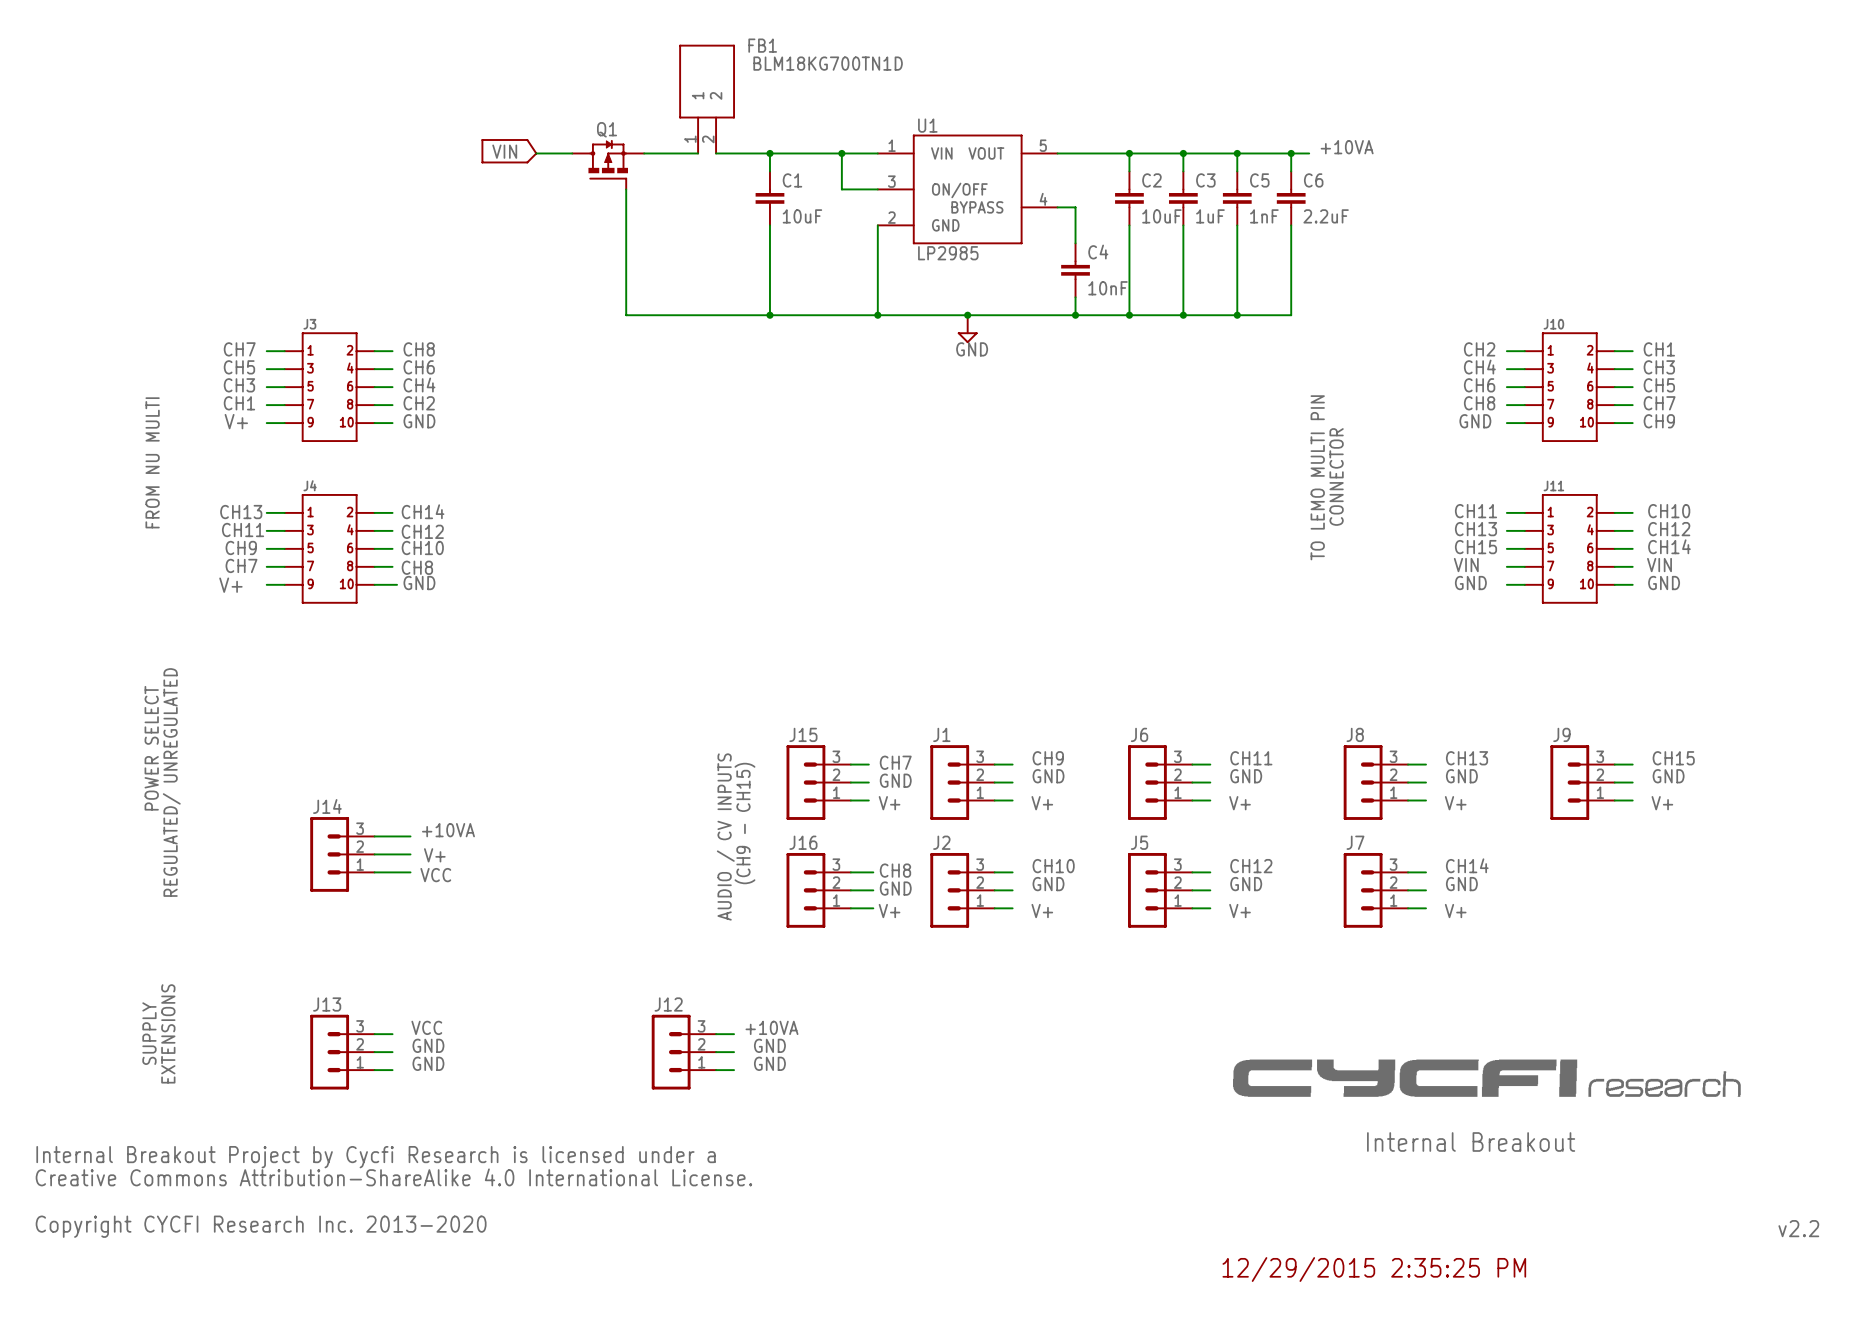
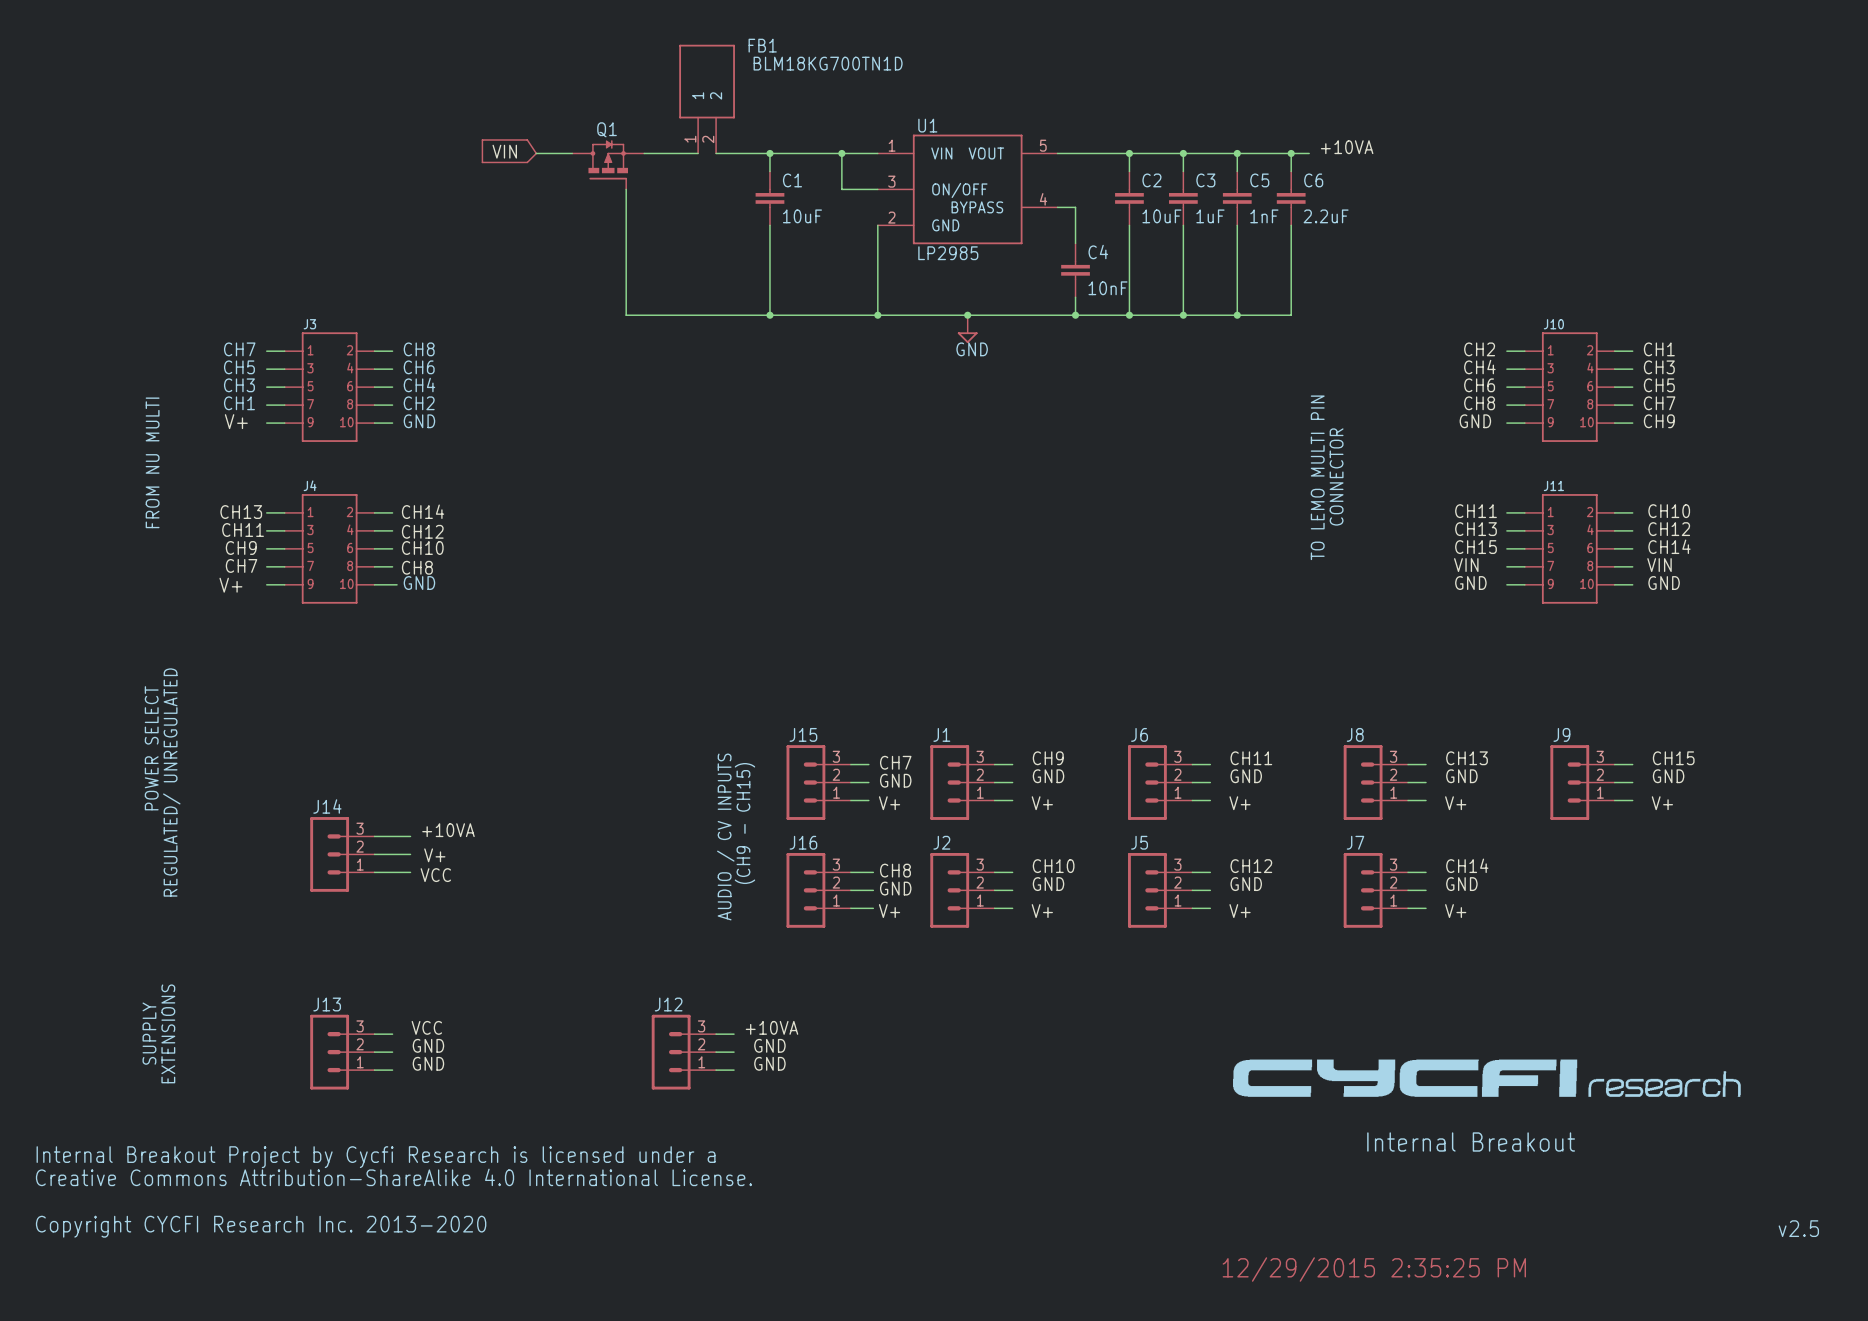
text: v2.2 (1798, 1228) -> v2.5 (1798, 1228)

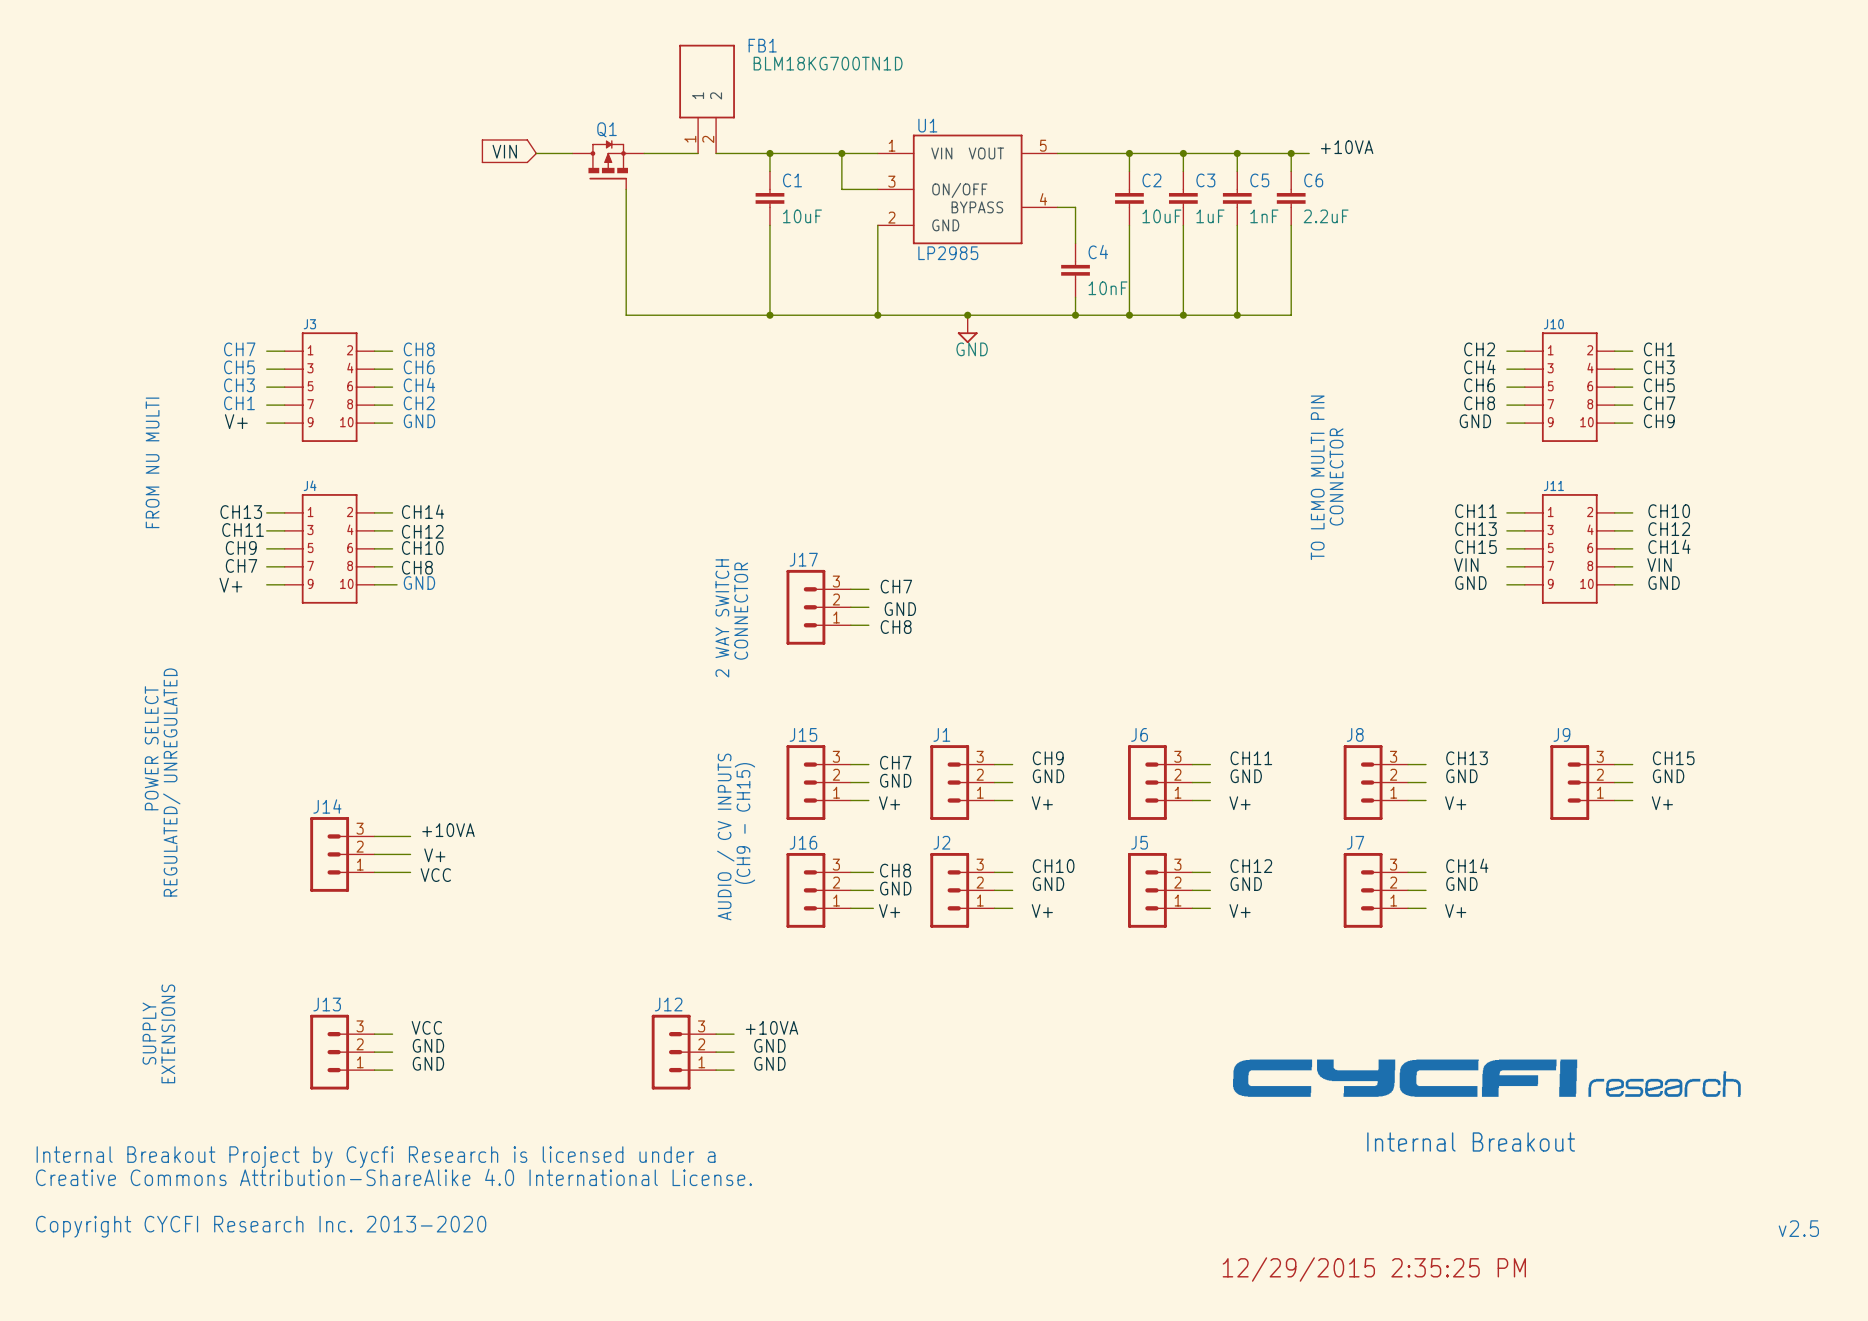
label: none -> CH7 (896, 586)
wire: none -> (850, 589) (868, 589)
J17: none -> (818, 607)
wire: none -> (850, 607) (868, 607)
label: none -> GND (900, 609)
text: none -> CONNECTOR (741, 611)
text: none -> 2 WAY SWITCH (722, 618)
wire: none -> (850, 625) (868, 625)
label: none -> CH8 (896, 627)

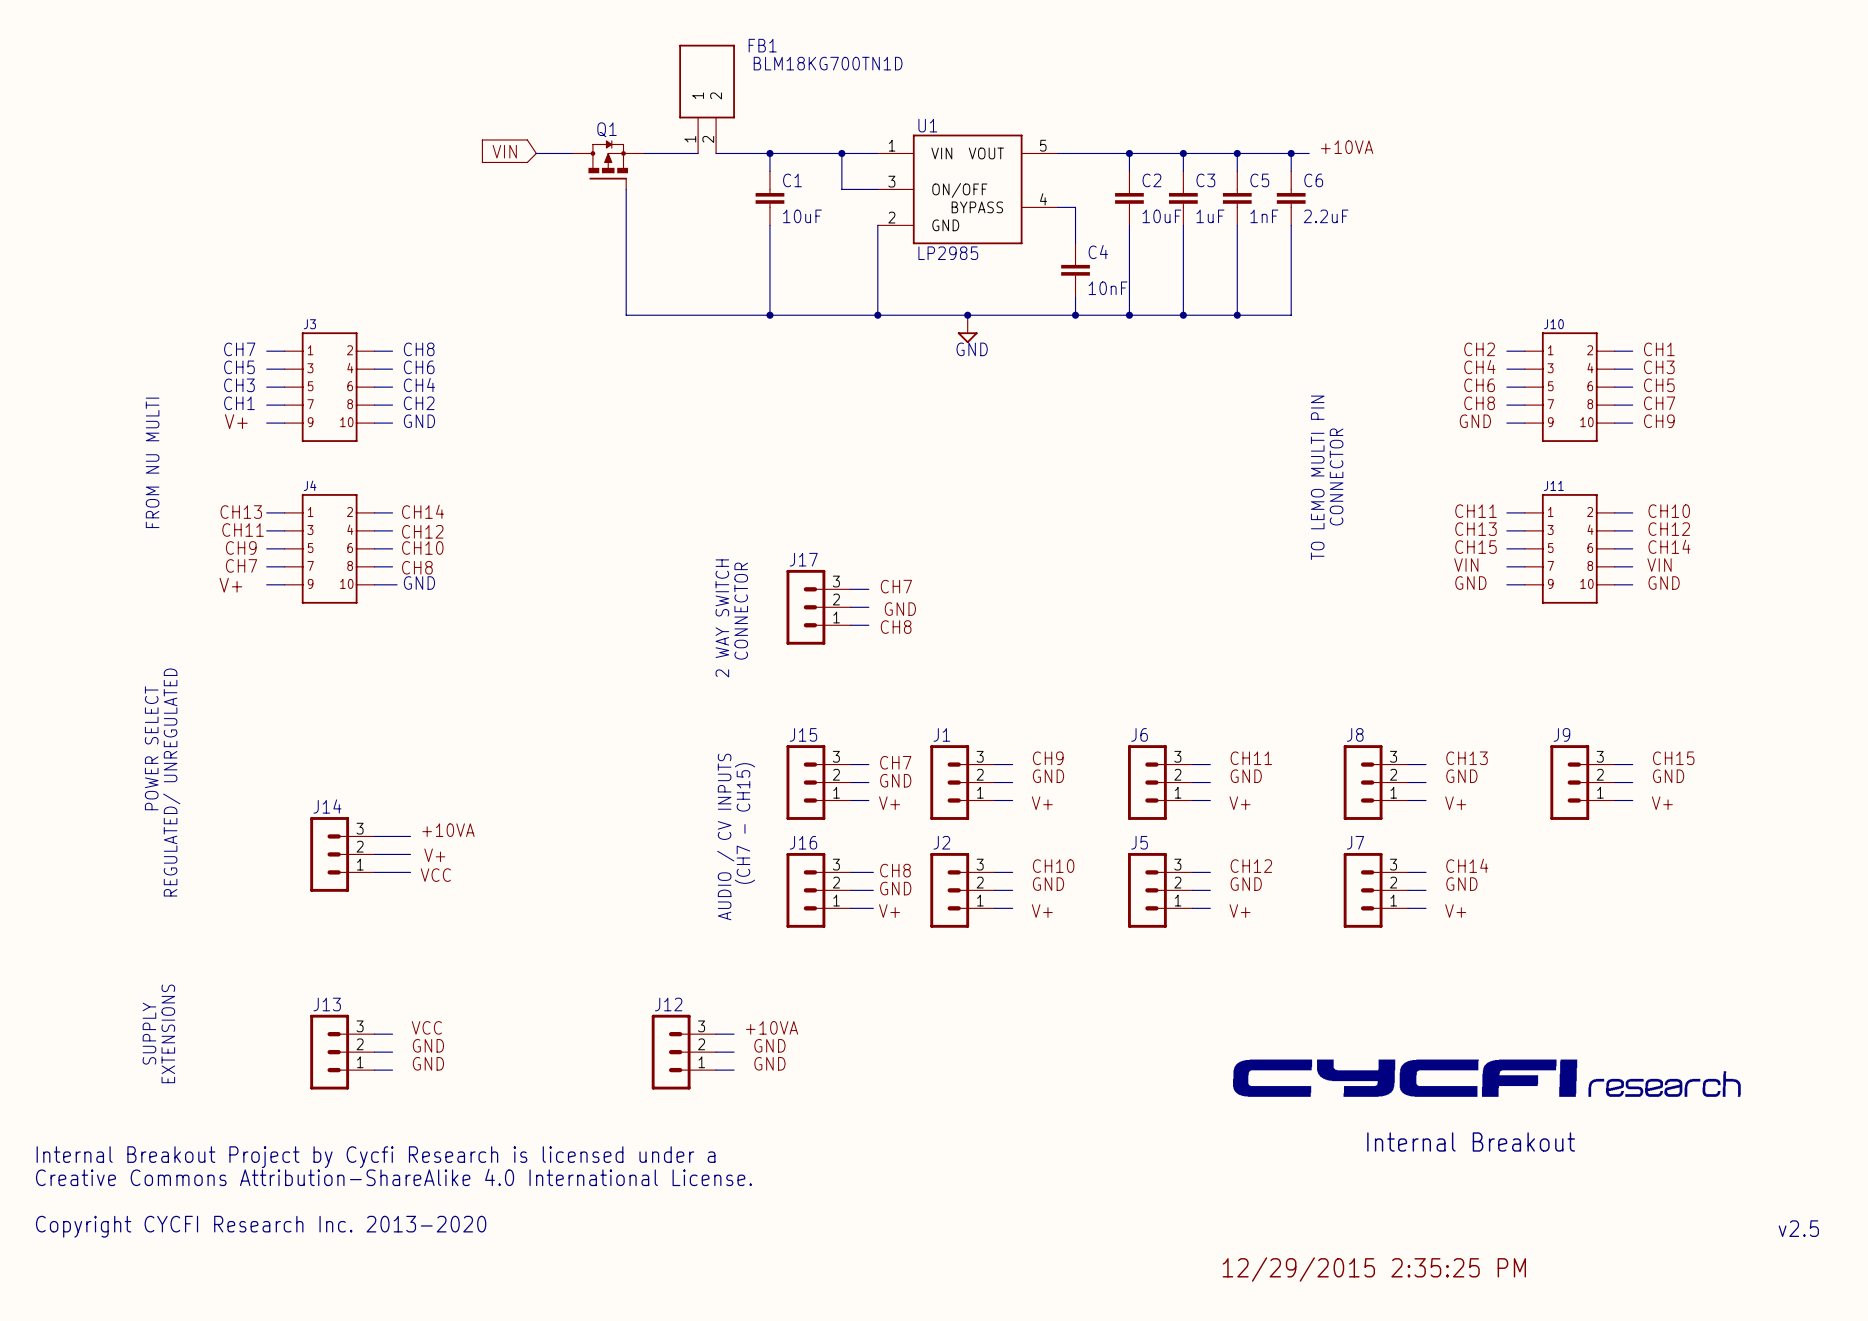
text: (CH9 - CH15) (744, 823) -> (CH7 - CH15) (744, 823)

